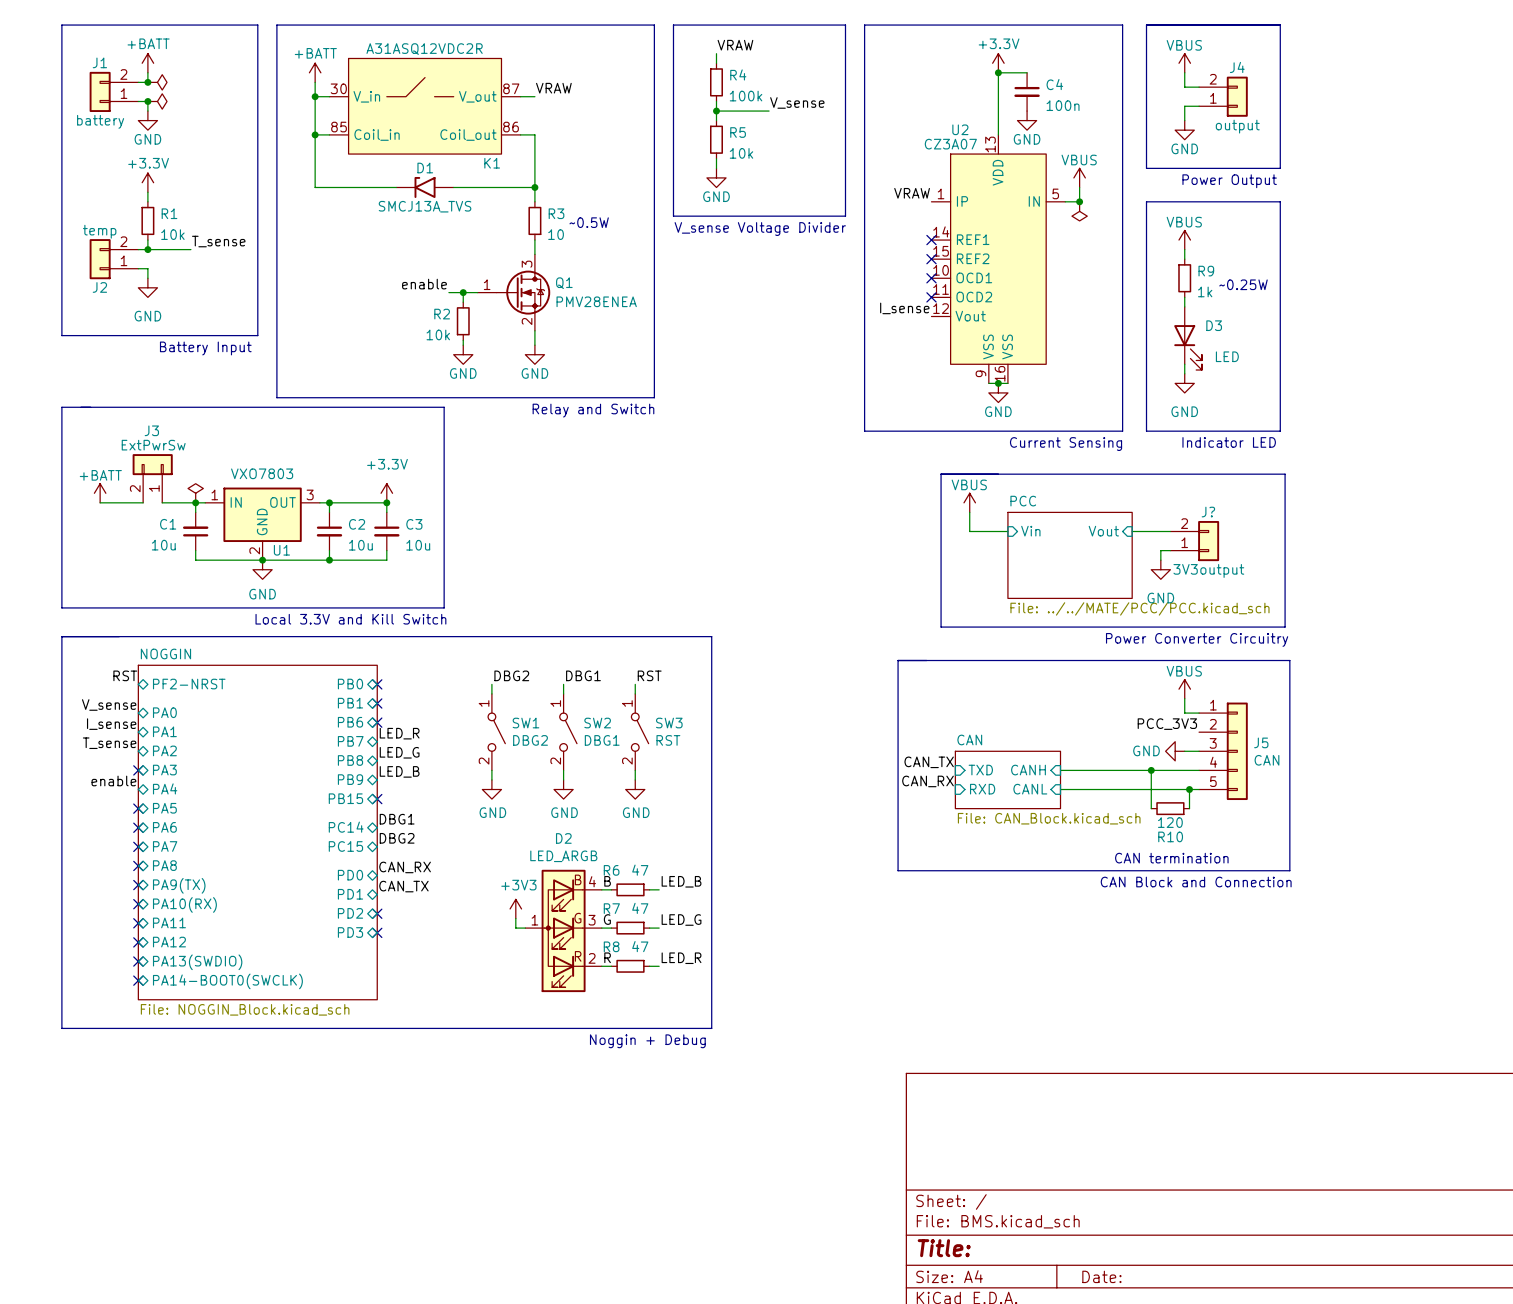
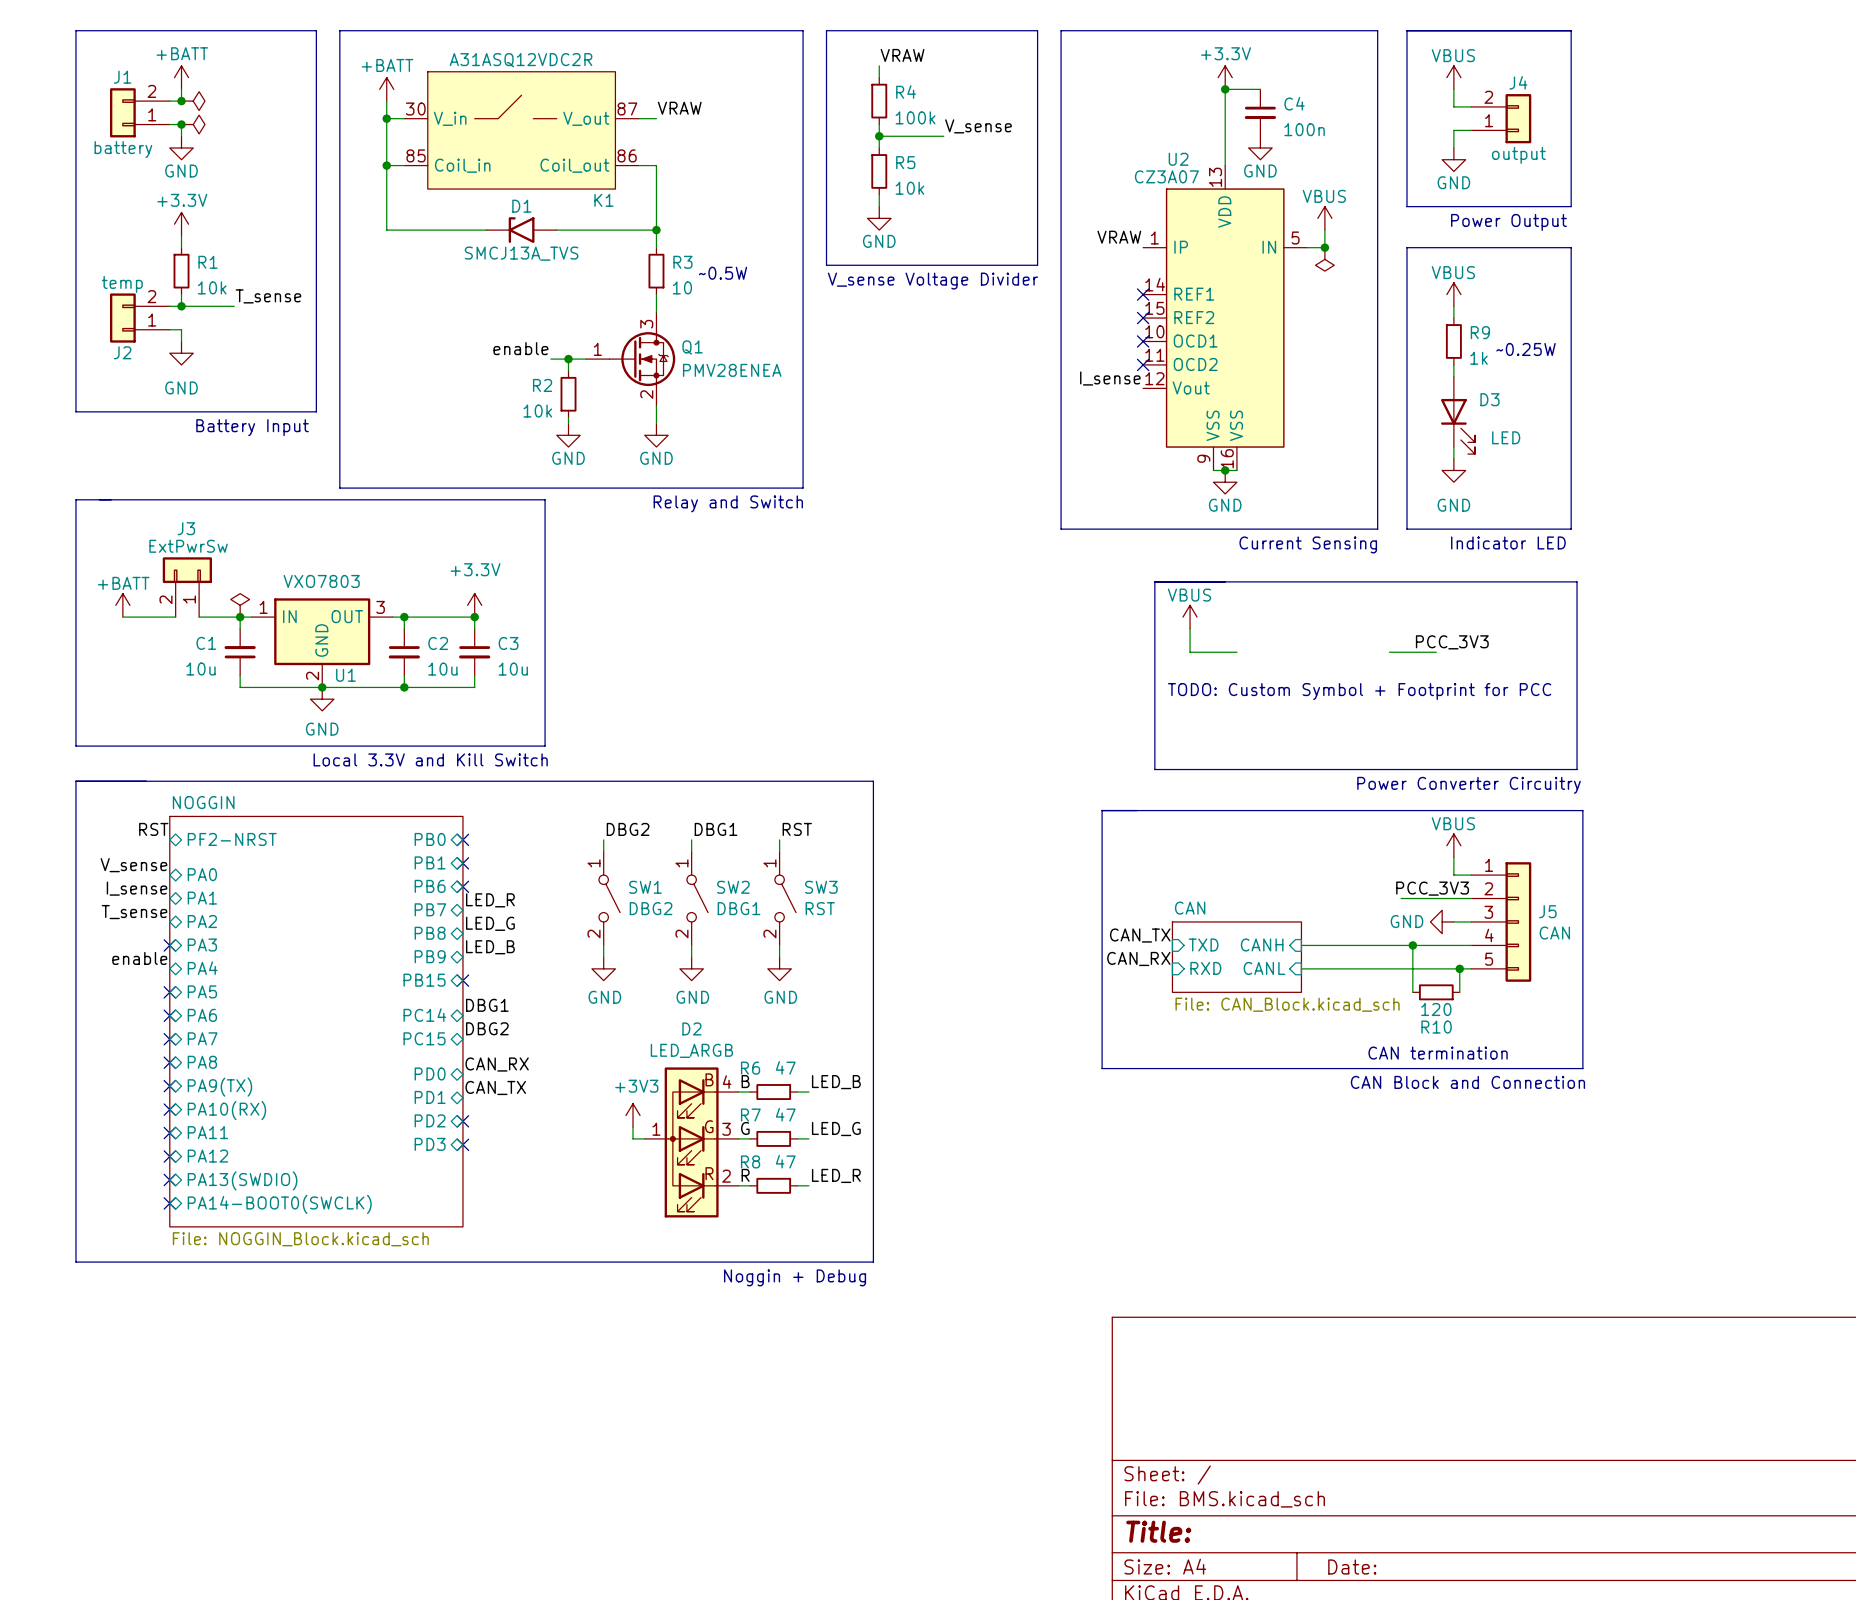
label: none -> PCC_3V3 (1452, 642)
sheet pin: Vin (1030, 531) -> none
sheet pin: Vout (1103, 531) -> none
J?: 3V3output (1194, 541) -> none
wire: (1170, 550) (1160, 550) (1160, 560) -> none
sheet PCC: File: ../../MATE/PCC/PCC.kicad_sch (1070, 555) -> none
text: none -> TODO: Custom Symbol + Footprint for PCC (1359, 691)
power symbol: GND (1160, 569) -> none
wire: none -> (1401, 898) (1471, 898)

